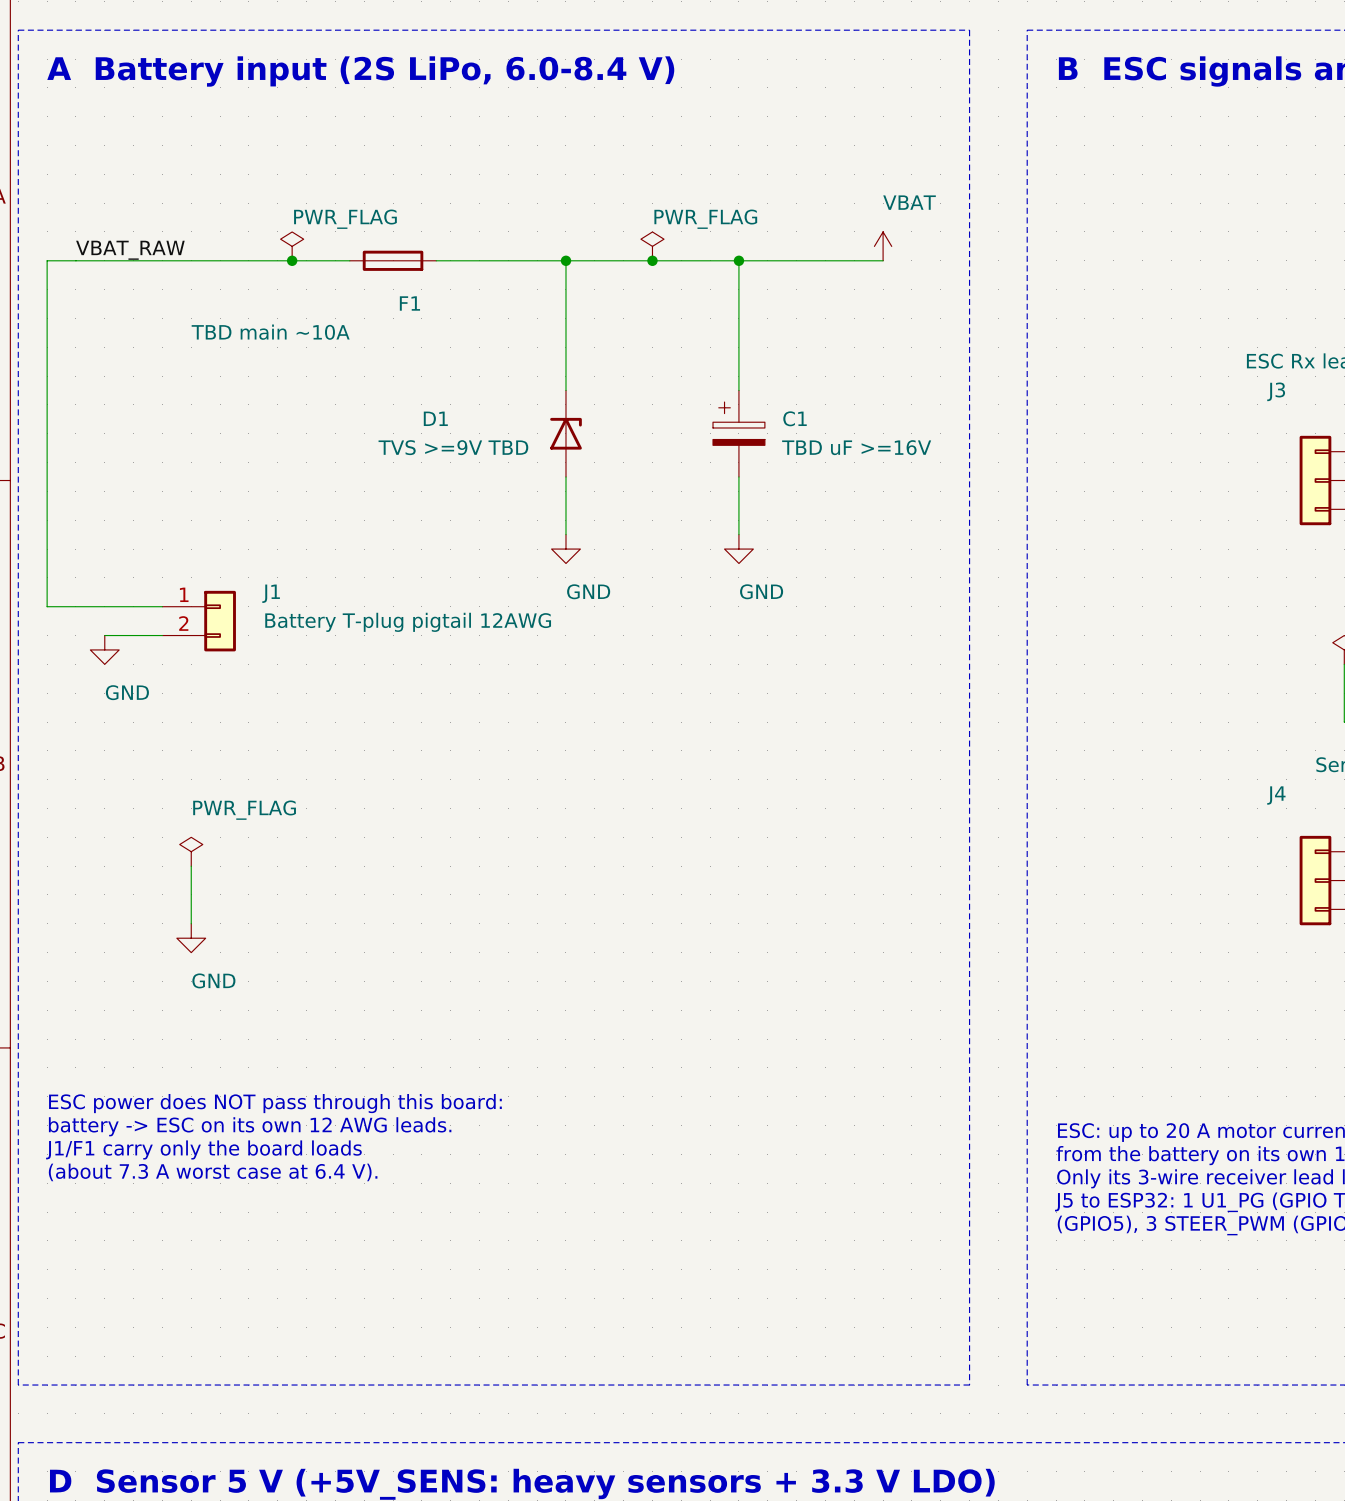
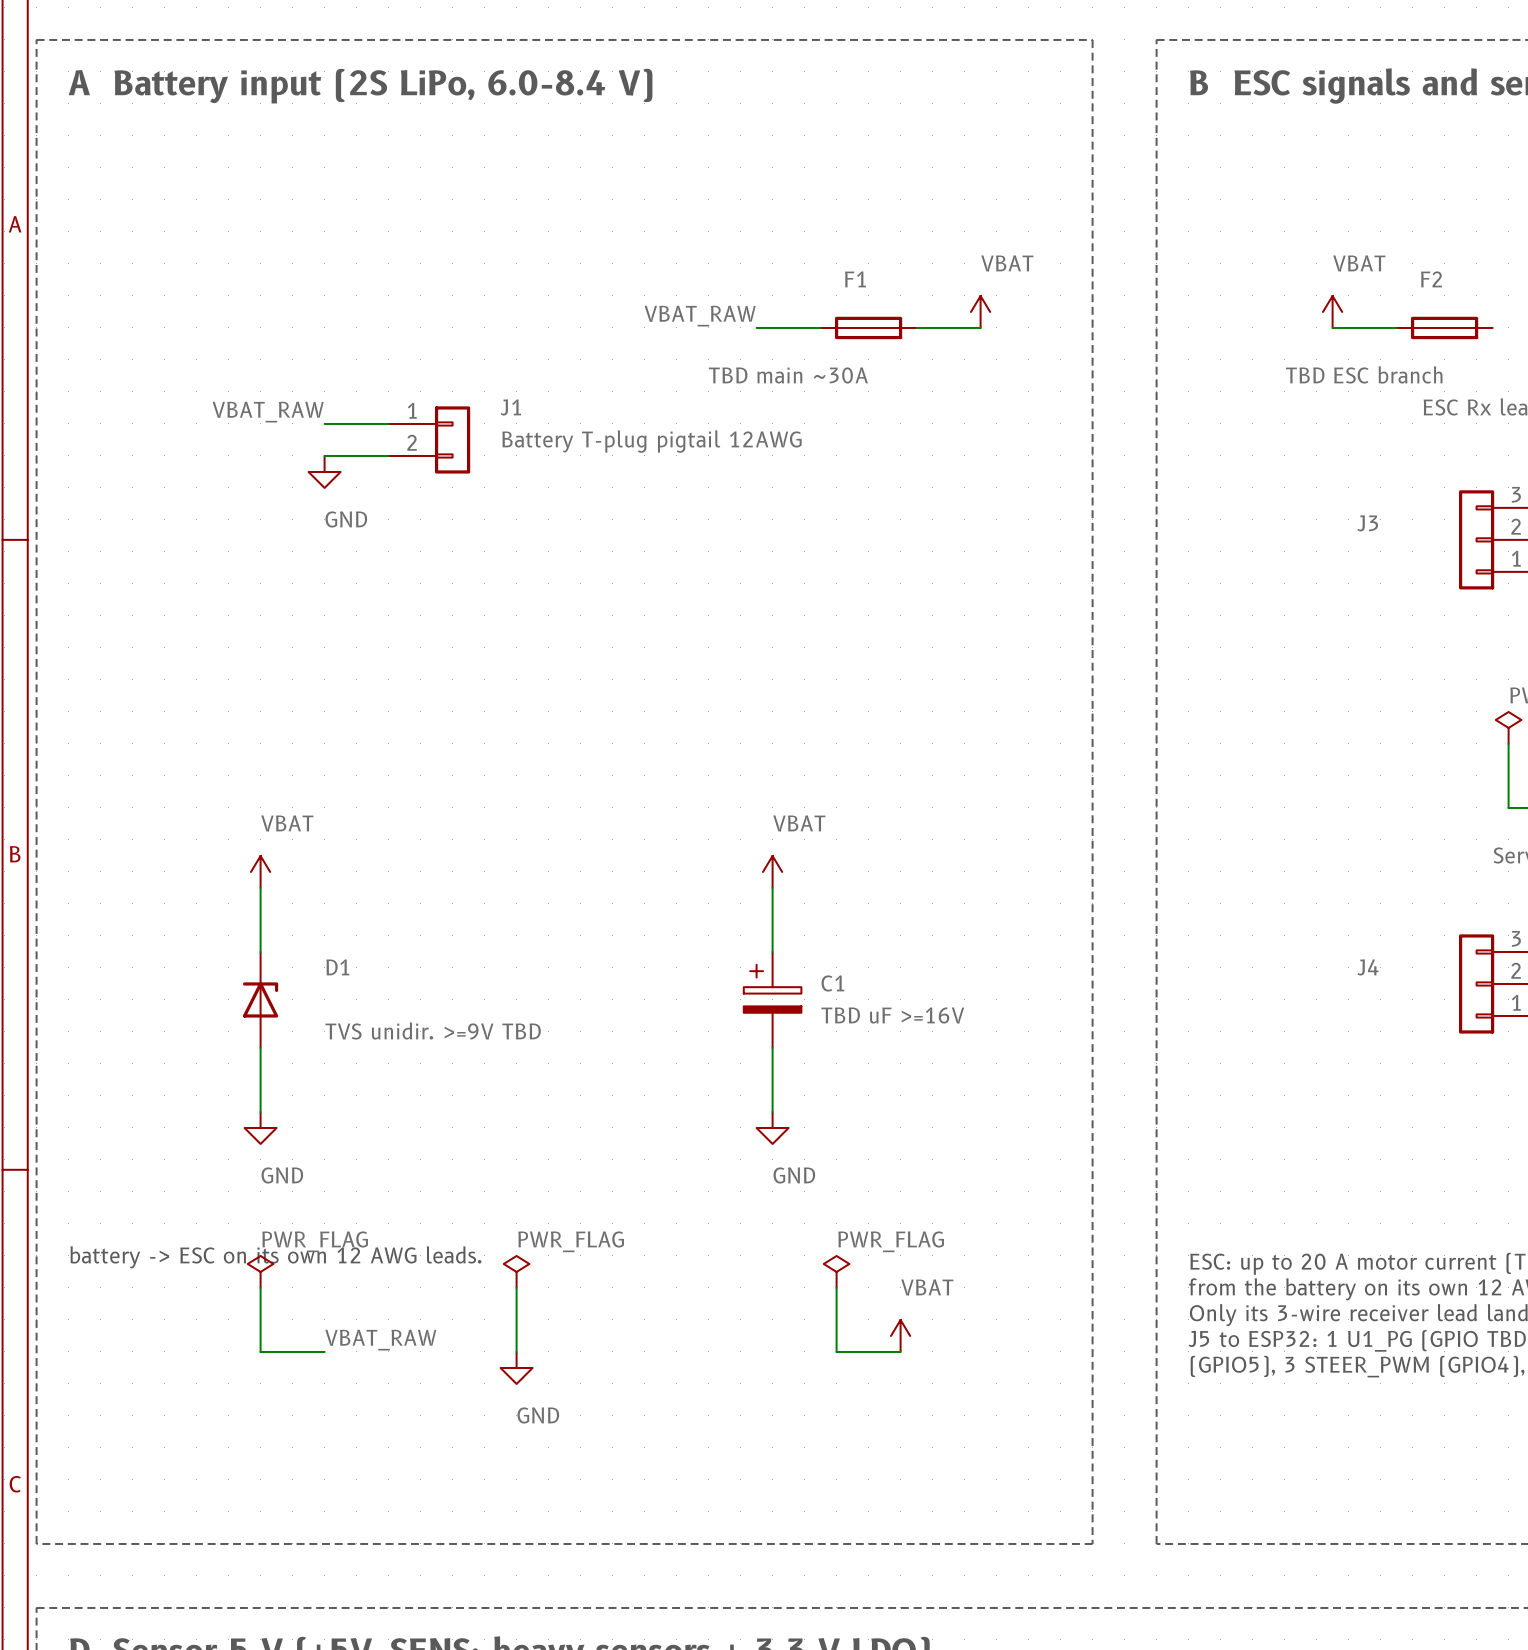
power symbol: PWR_FLAG (292, 246) -> none
power symbol: PWR_FLAG (652, 246) -> none
power symbol position: VBAT (883, 246) -> VBAT (980, 311)
label position: VBAT_RAW (130, 250) -> VBAT_RAW (268, 412)
junction: (292, 260) -> none
wire: (349, 260) (47, 260) (47, 606) (162, 606) -> none
F1 position: (393, 260) -> (868, 327)
wire: (436, 260) (883, 260) -> none
wire: (565, 260) (565, 390) -> none
junction: (565, 260) -> none
junction: (652, 260) -> none
wire: (738, 260) (738, 390) -> none
junction: (738, 260) -> none
power symbol: none -> VBAT (1332, 311)
label: none -> VBAT_RAW (700, 316)
wire: none -> (756, 327) (820, 327)
wire: none -> (916, 327) (980, 327)
wire: none -> (1332, 327) (1396, 327)
F2: none -> TBD ESC branch (1444, 327)
F1 name position: F1 (409, 303) -> F1 (855, 279)
F1 value: TBD main ~10A (270, 332) -> TBD main ~30A (788, 375)
wire: none -> (324, 423) (388, 423)
J3 name position: J3 (1276, 391) -> J3 (1367, 523)
wire: none -> (324, 455) (388, 455)
D1 name position: D1 (435, 418) -> D1 (337, 967)
power symbol: none -> GND (324, 471)
D1 position: (565, 433) -> (260, 999)
C1 position: (738, 433) -> (772, 999)
D1 value: TVS >=9V TBD (453, 447) -> TVS unidir. >=9V TBD (433, 1030)
wire: (565, 476) (565, 534) -> none
wire: (738, 476) (738, 534) -> none
power symbol: GND (565, 549) -> none
power symbol: GND (738, 549) -> none
J1 position: (199, 621) -> (429, 439)
wire: (104, 635) (162, 635) -> none
power symbol: GND (104, 649) -> none
power symbol: none -> VBAT (260, 871)
power symbol: none -> VBAT (772, 871)
wire: none -> (260, 887) (260, 951)
wire: none -> (772, 887) (772, 951)
J4 name position: J4 (1276, 795) -> J4 (1367, 967)
power symbol: PWR_FLAG (191, 851) -> none
wire: (191, 866) (191, 923) -> (260, 1047) (260, 1111)
power symbol position: GND (191, 938) -> GND (260, 1127)
wire: none -> (772, 1047) (772, 1111)
power symbol: none -> GND (772, 1127)
text: ESC power does NOT pass through this board: (275, 1103) -> none
power symbol: none -> PWR_FLAG (260, 1271)
power symbol: none -> PWR_FLAG (516, 1271)
power symbol: none -> PWR_FLAG (836, 1271)
text: J1/F1 carry only the board loads (203, 1149) -> none
wire: none -> (260, 1287) (260, 1351) (324, 1351)
wire: none -> (516, 1287) (516, 1351)
wire: none -> (836, 1287) (836, 1351) (900, 1351)
text: (about 7.3 A worst case at 6.4 V). (213, 1172) -> none
power symbol: none -> VBAT (900, 1335)
label: none -> VBAT_RAW (380, 1340)
power symbol: none -> GND (516, 1367)

